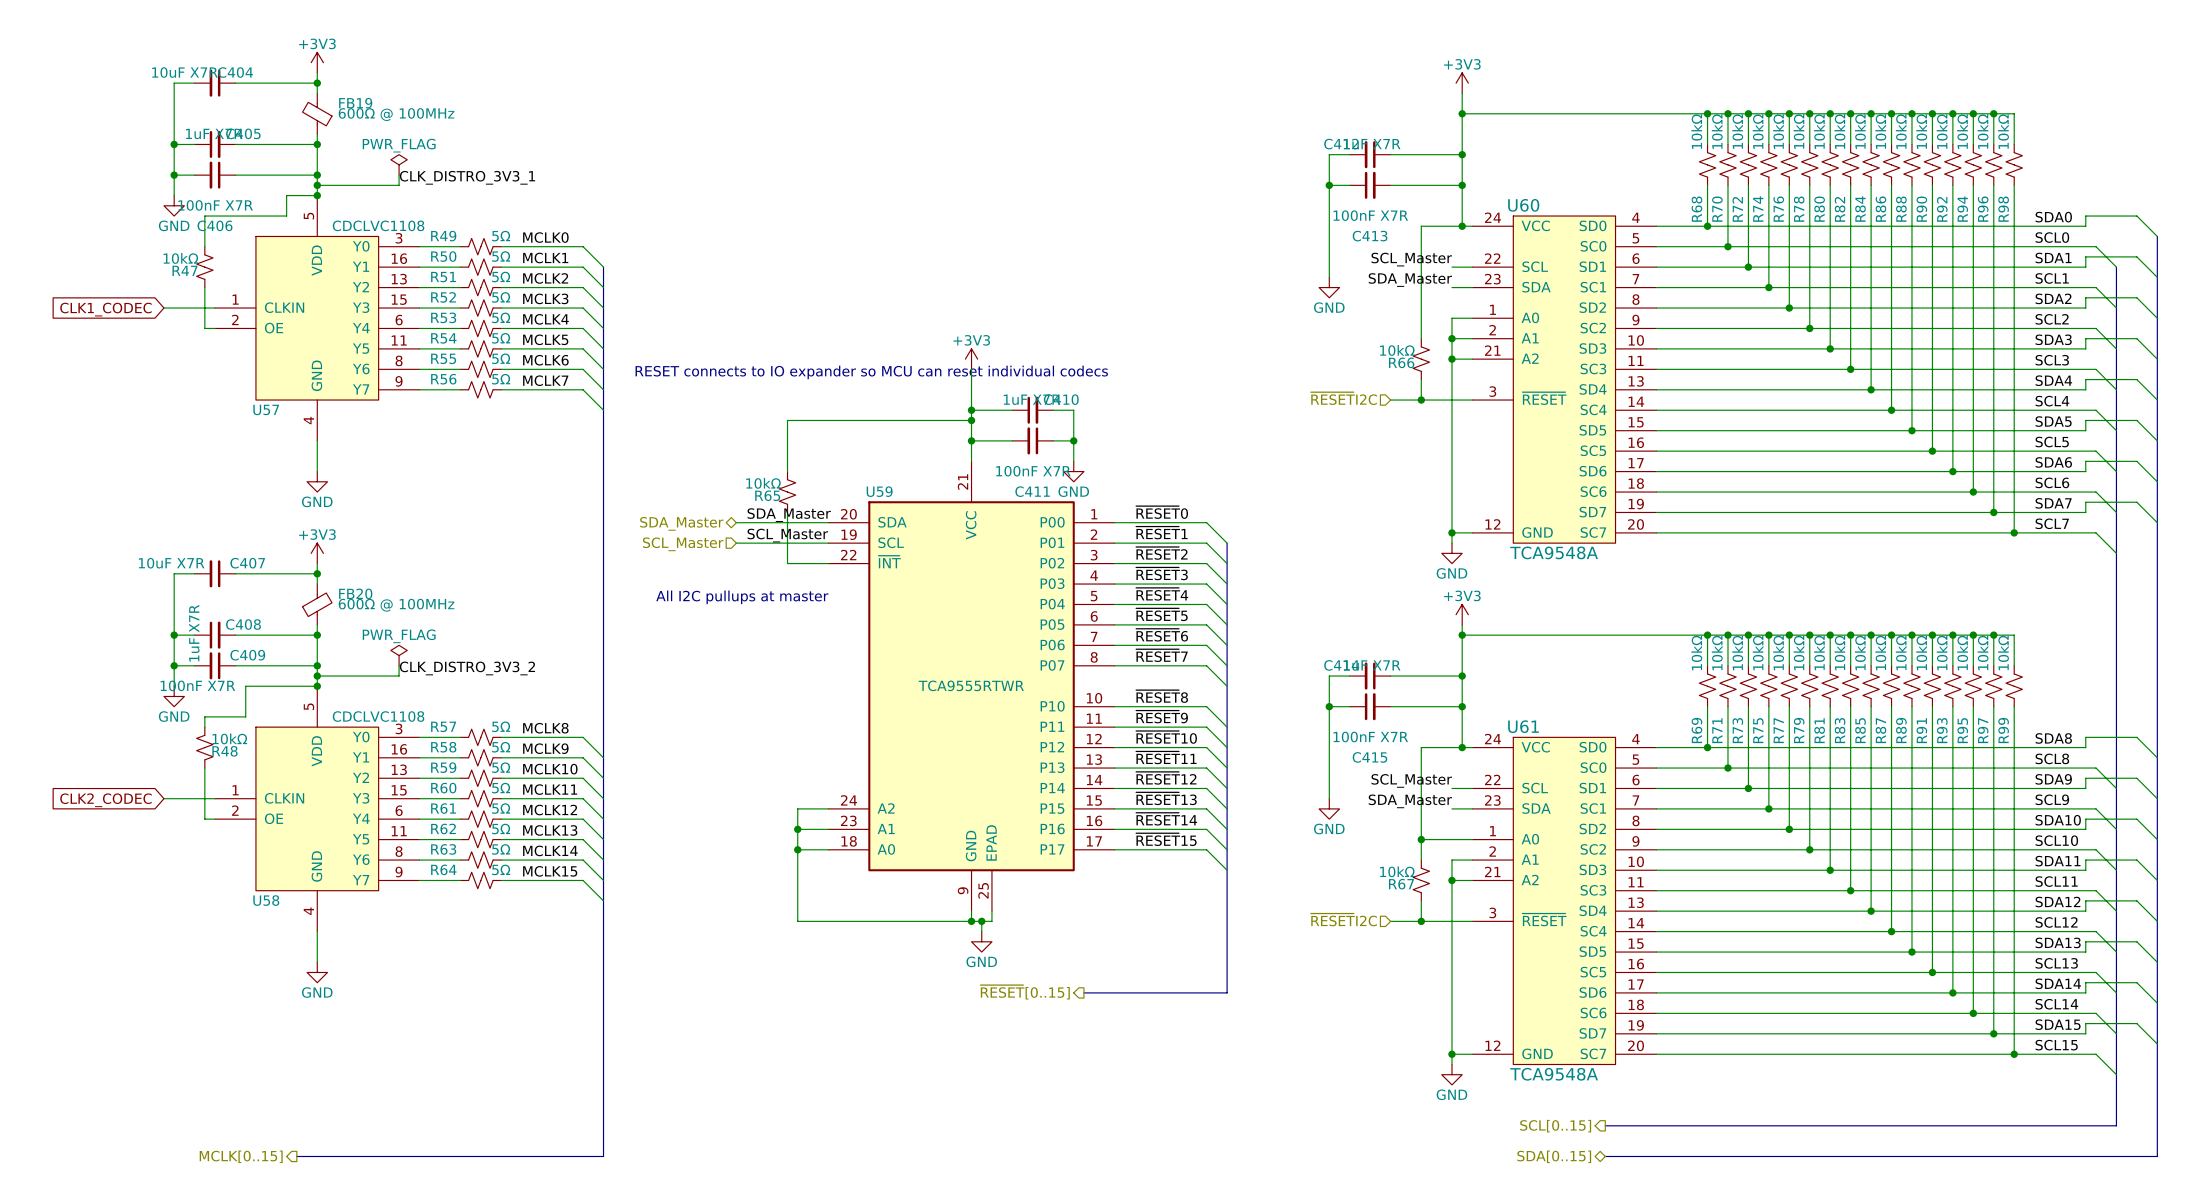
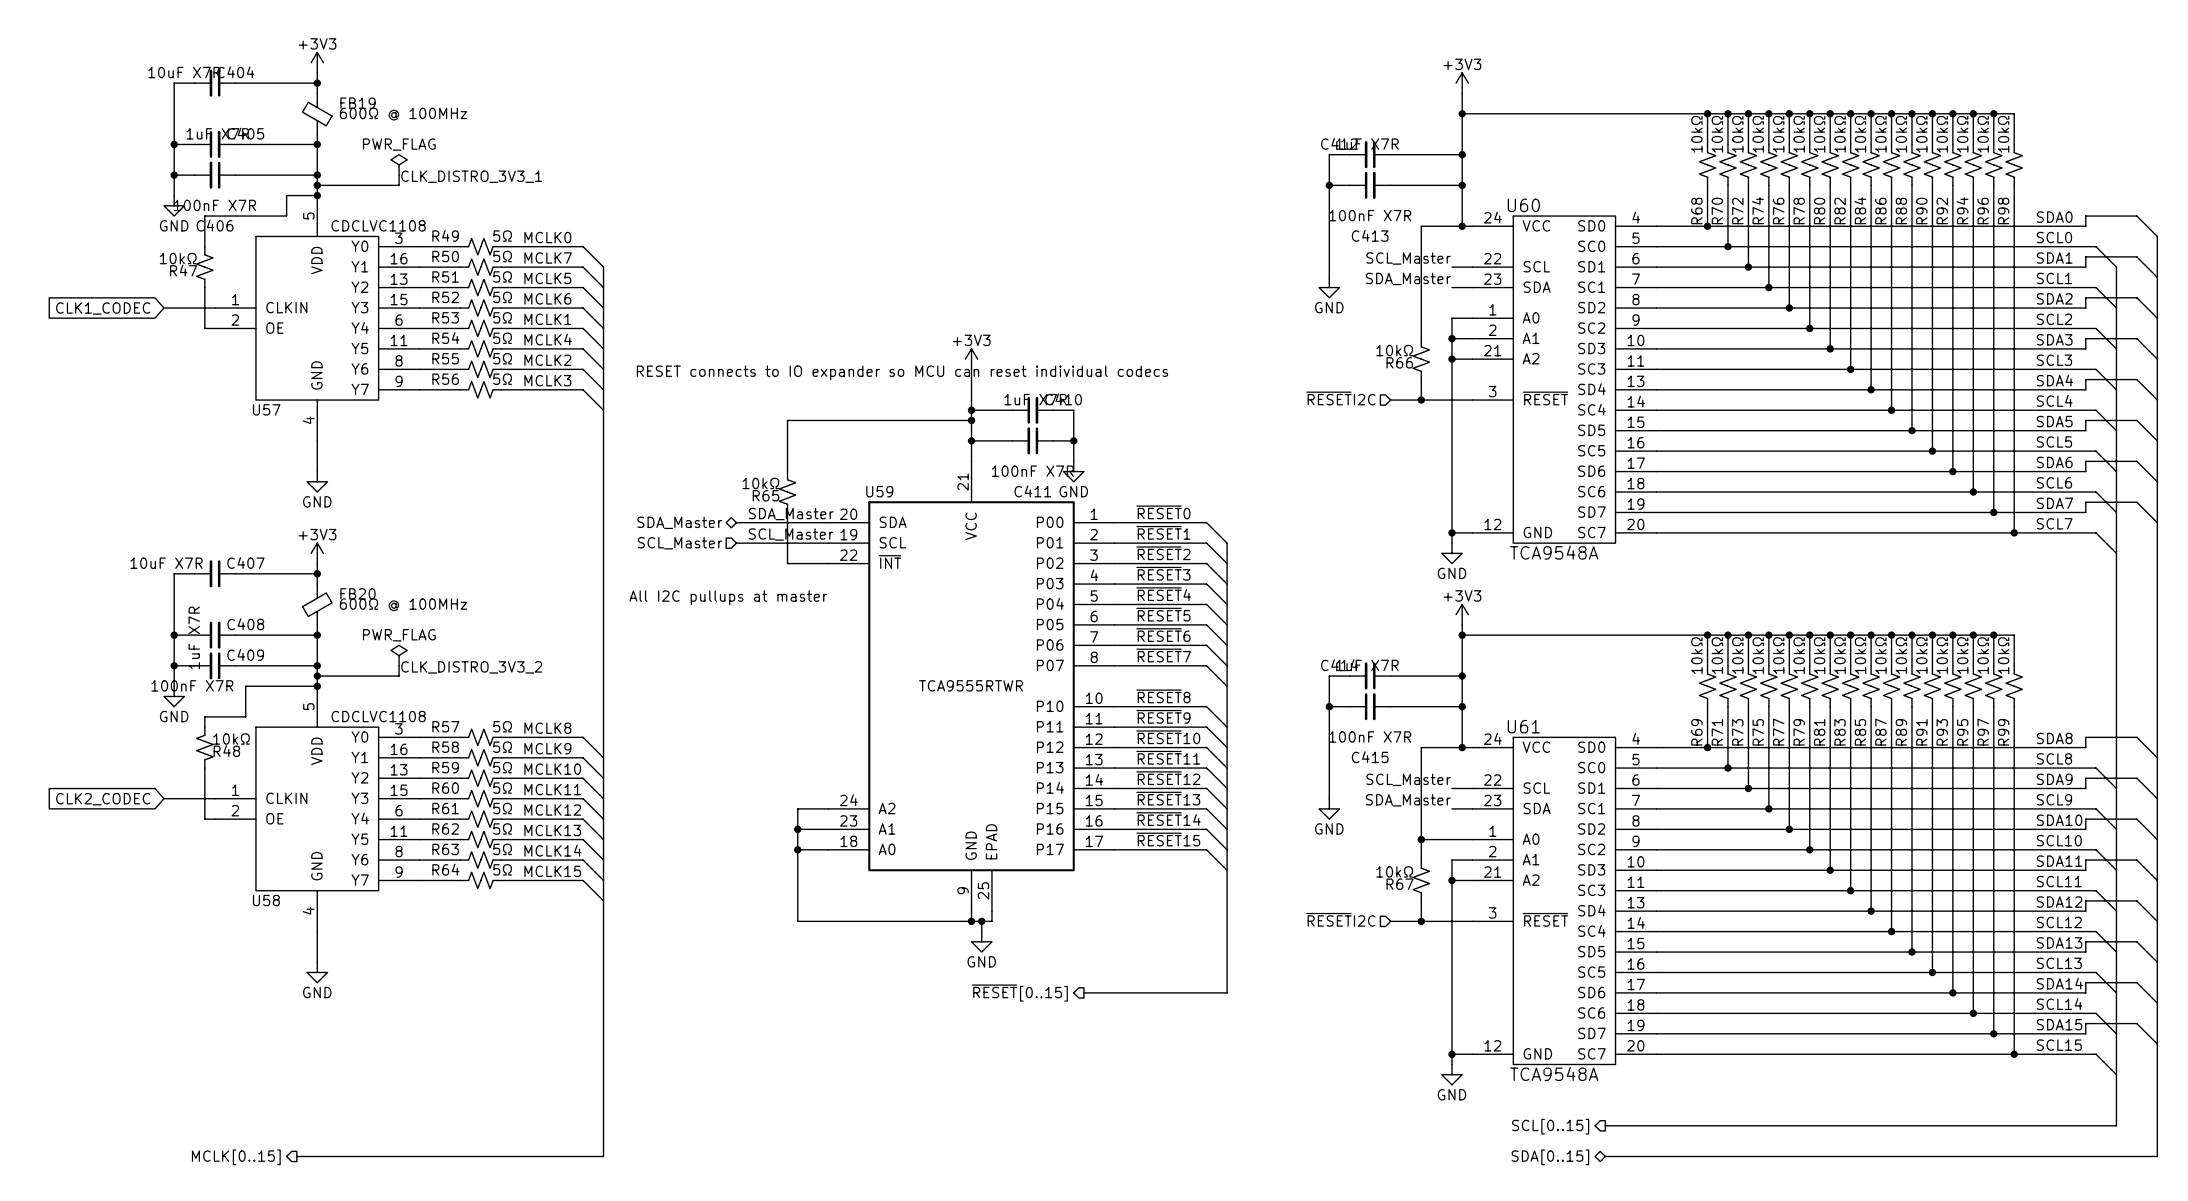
label: MCLK1 (545, 258) -> MCLK7 (548, 258)
label: MCLK2 (545, 278) -> MCLK5 (547, 278)
label: MCLK3 (545, 298) -> MCLK6 (547, 298)
label: MCLK4 (545, 319) -> MCLK1 (547, 319)
label: MCLK5 (545, 339) -> MCLK4 (548, 339)
label: MCLK6 (545, 360) -> MCLK2 (547, 360)
label: MCLK7 (545, 380) -> MCLK3 (547, 380)

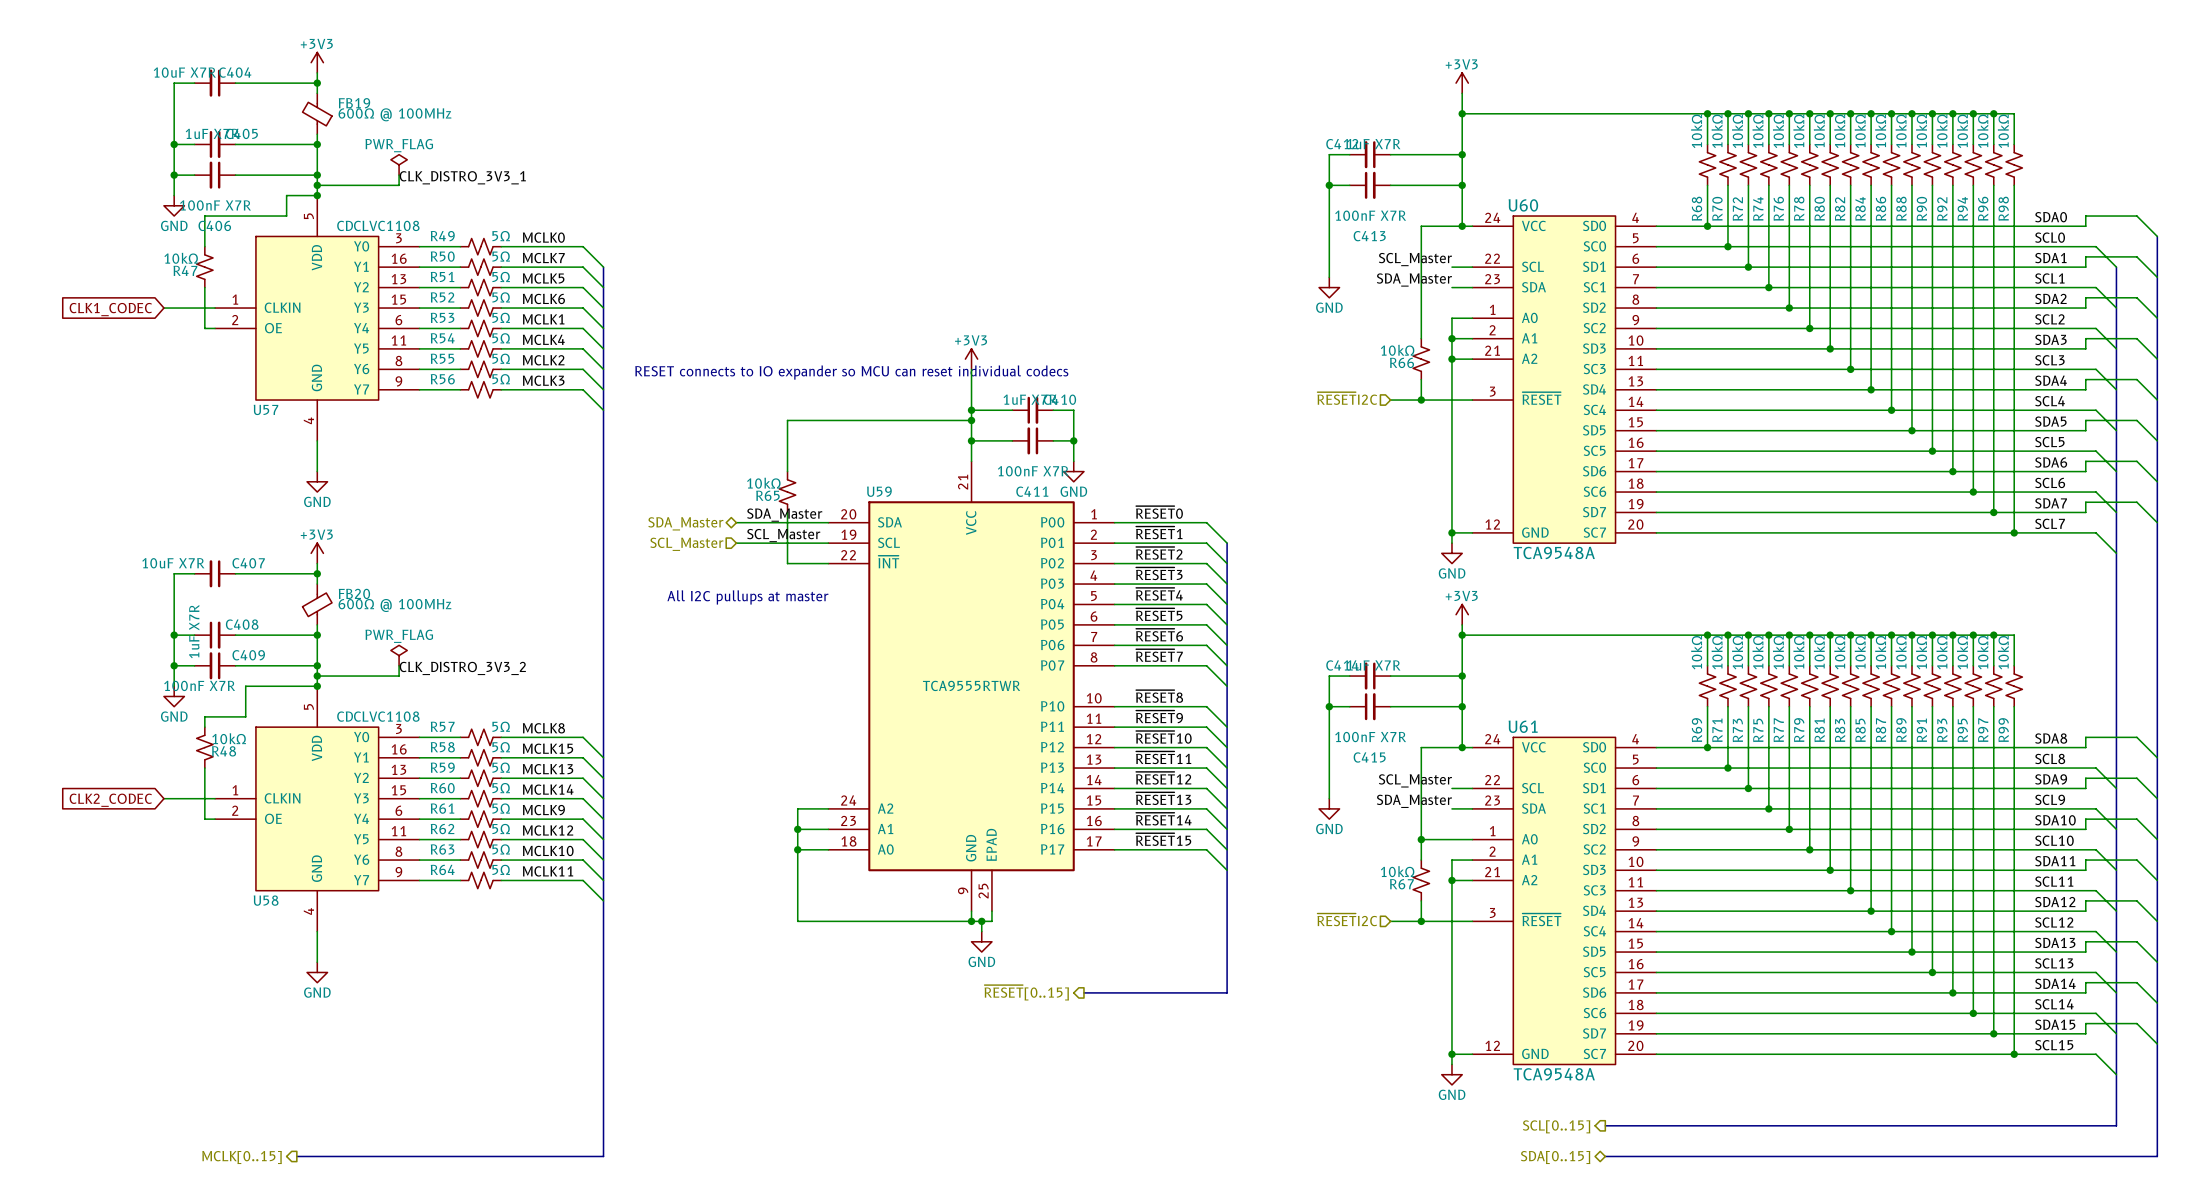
label: MCLK9 (547, 748) -> MCLK15 (548, 748)
label: MCLK10 (552, 769) -> MCLK13 (548, 769)
label: MCLK11 (552, 789) -> MCLK14 (548, 789)
label: MCLK12 (552, 810) -> MCLK9 (543, 810)
label: MCLK13 (552, 830) -> MCLK12 (548, 830)
label: MCLK14 (552, 850) -> MCLK10 (548, 850)
label: MCLK15 (552, 871) -> MCLK11 (548, 871)

